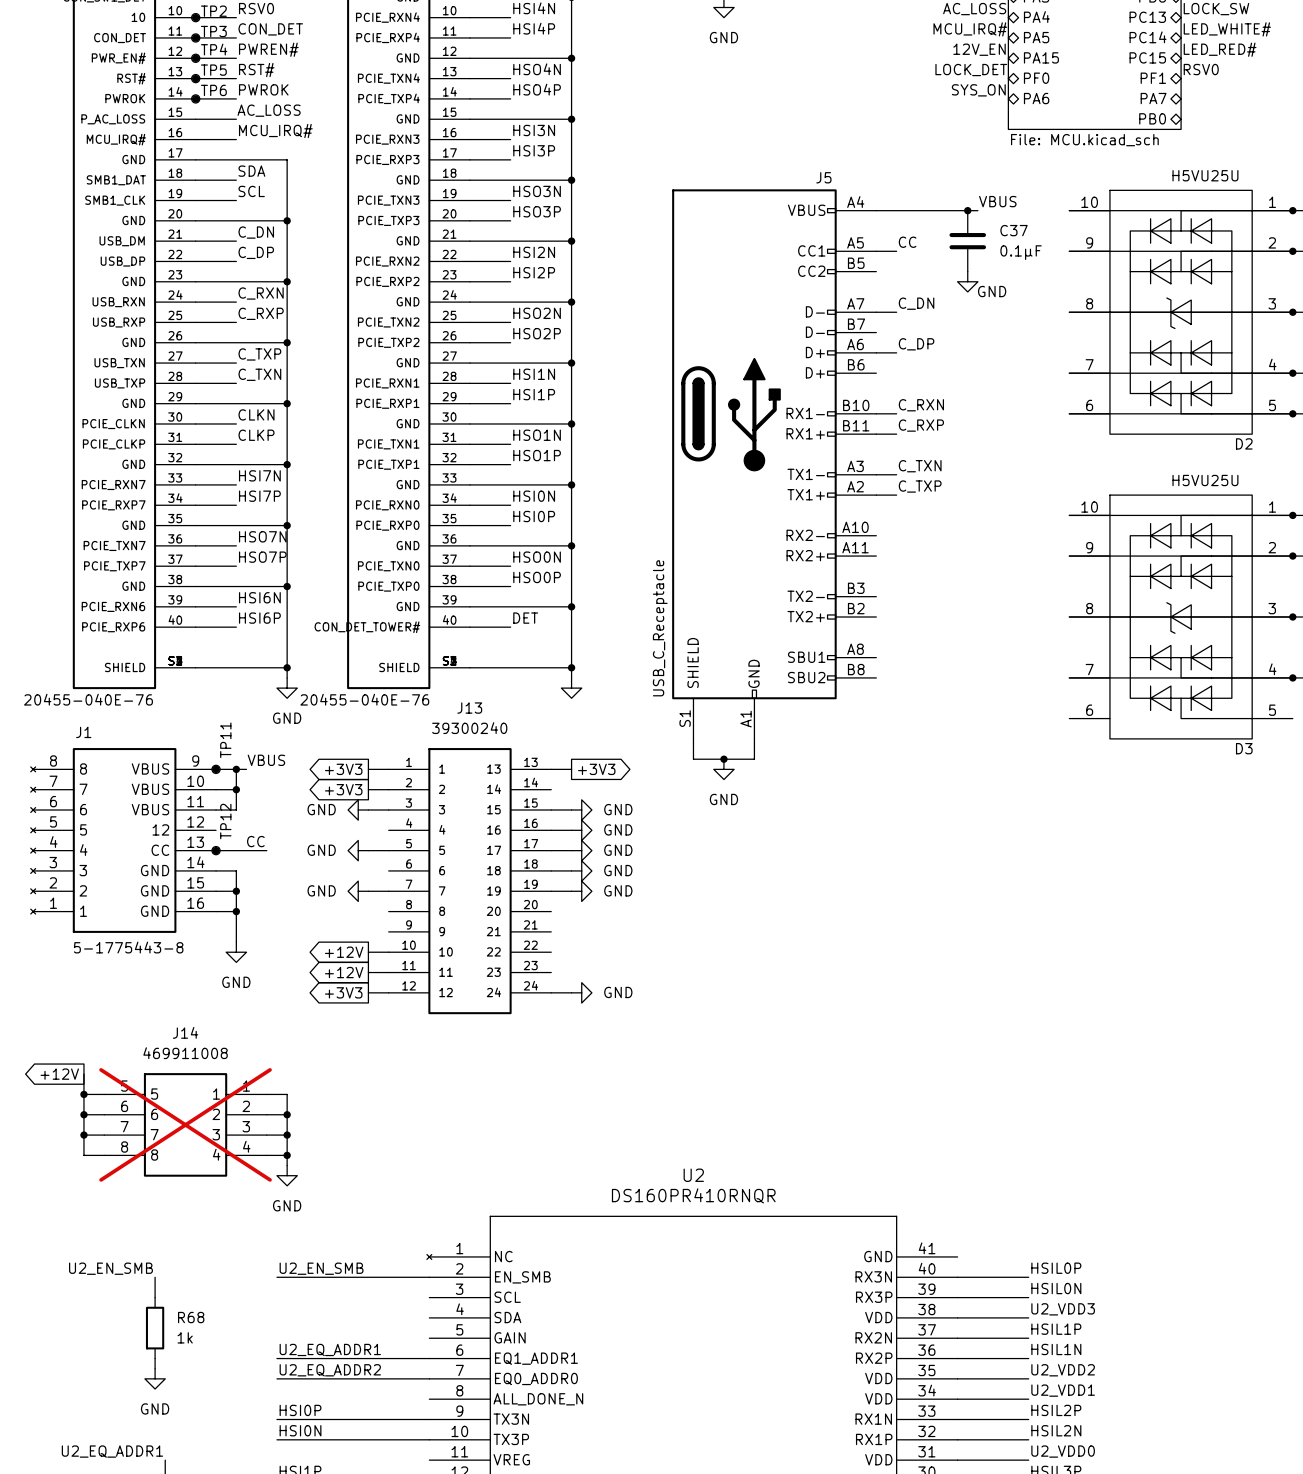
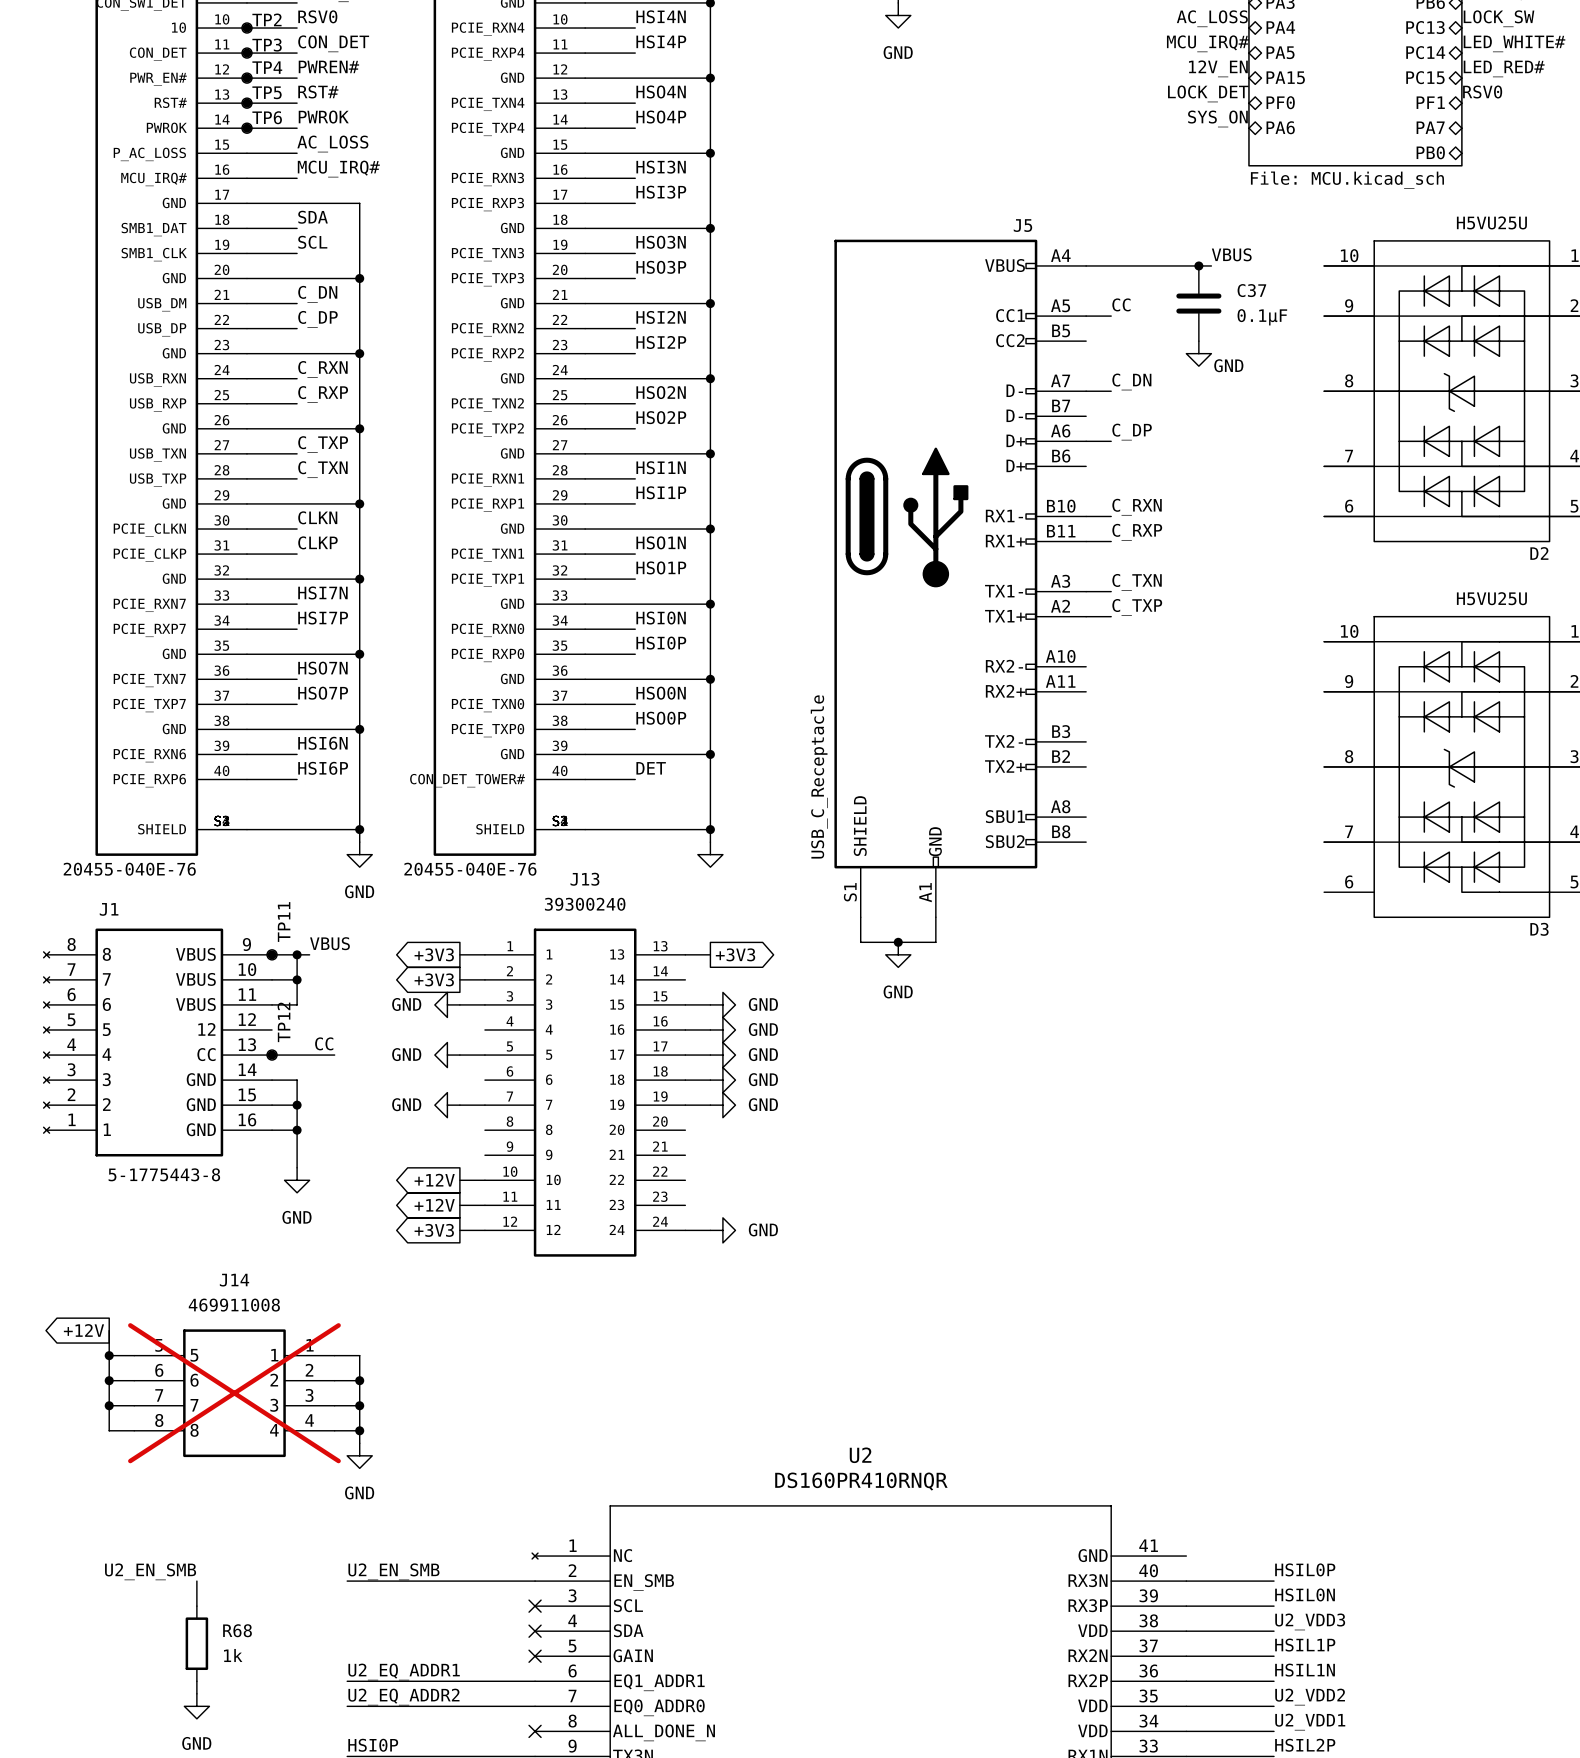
no-connect mark: none -> (535, 1606)
no-connect mark: none -> (535, 1631)
no-connect mark: none -> (535, 1656)
no-connect mark: none -> (535, 1731)

